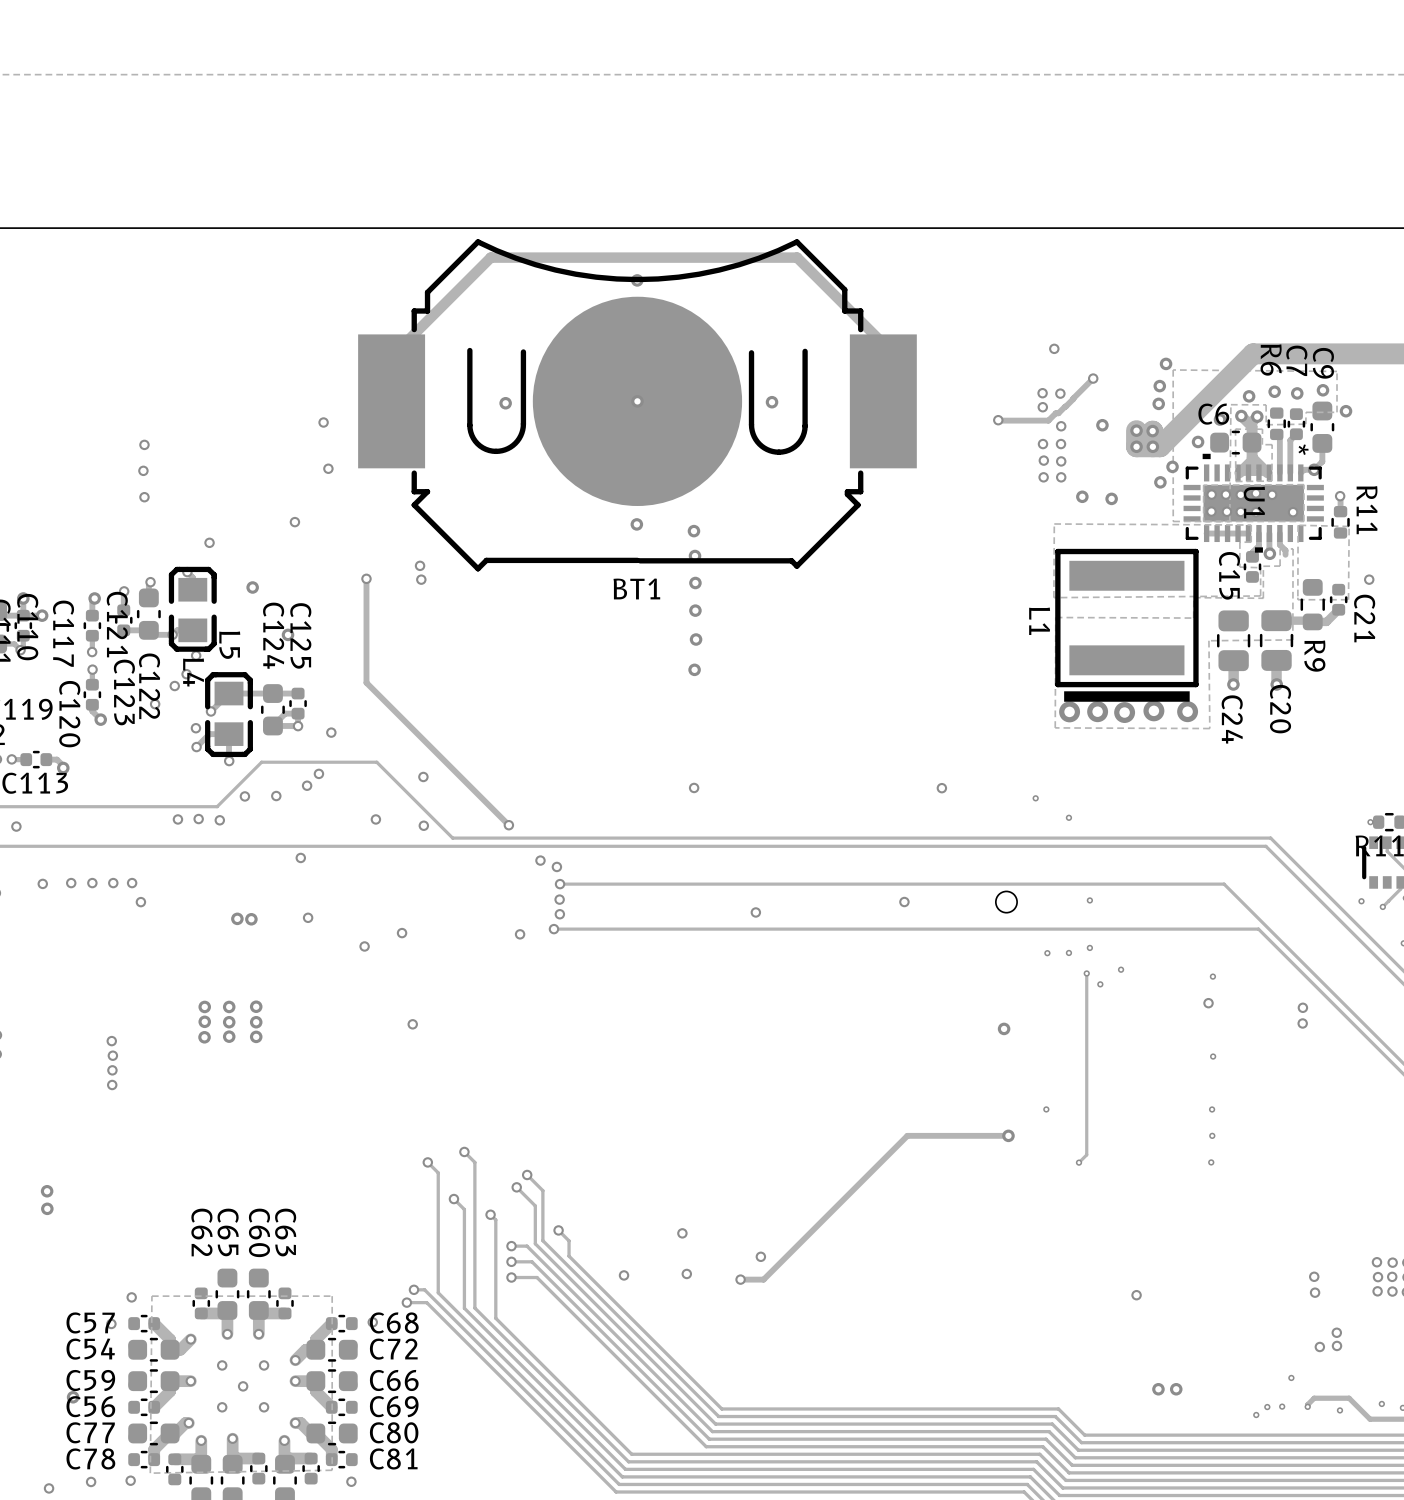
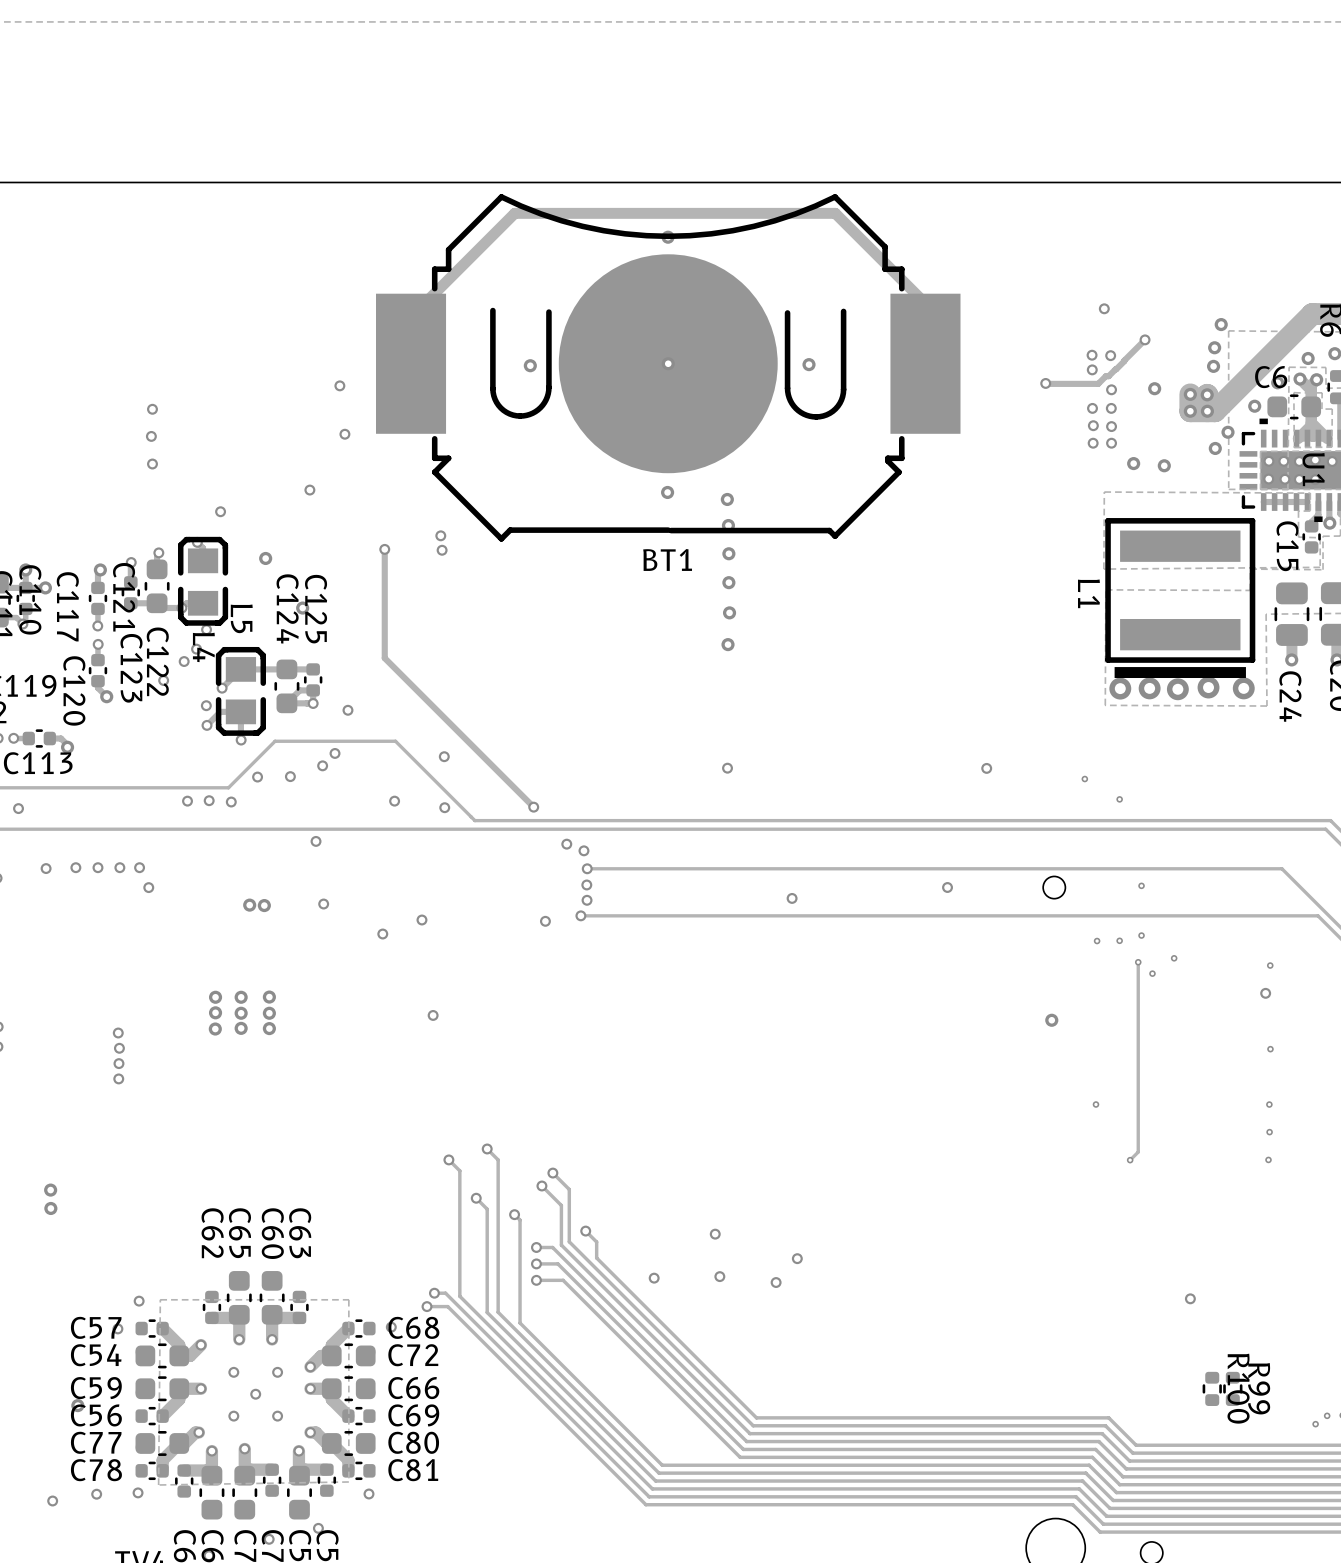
track: (1008, 1135) (907, 1135) (763, 1279) (740, 1279) -> none
via: (1008, 1135) -> none
R100: none -> (1212, 1388)
R99: none -> (1232, 1388)
via: (1158, 1389) -> none
via: (1176, 1389) -> none

